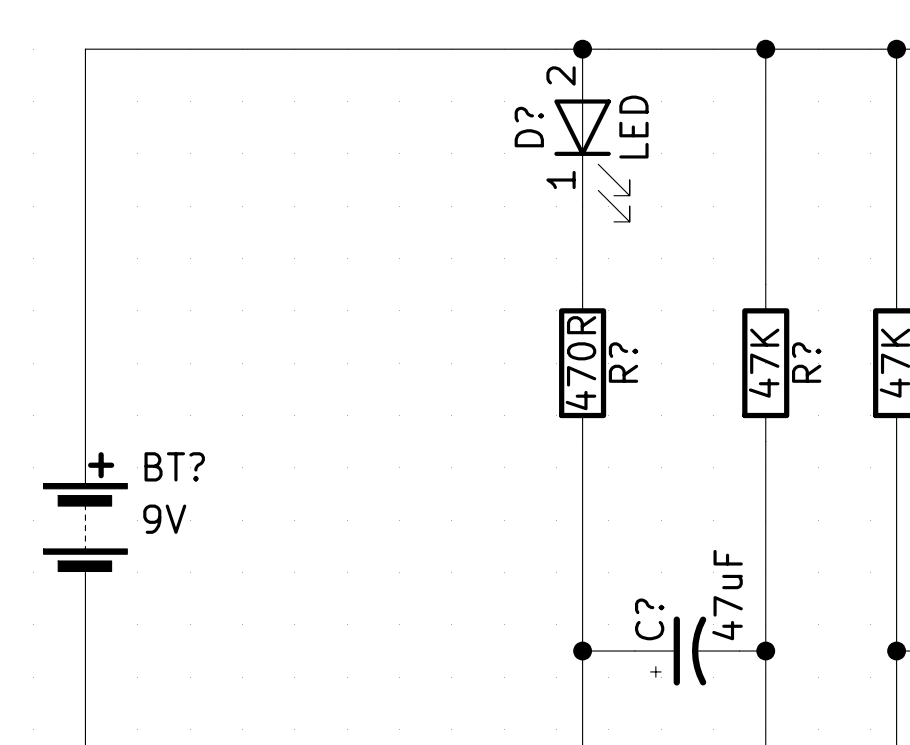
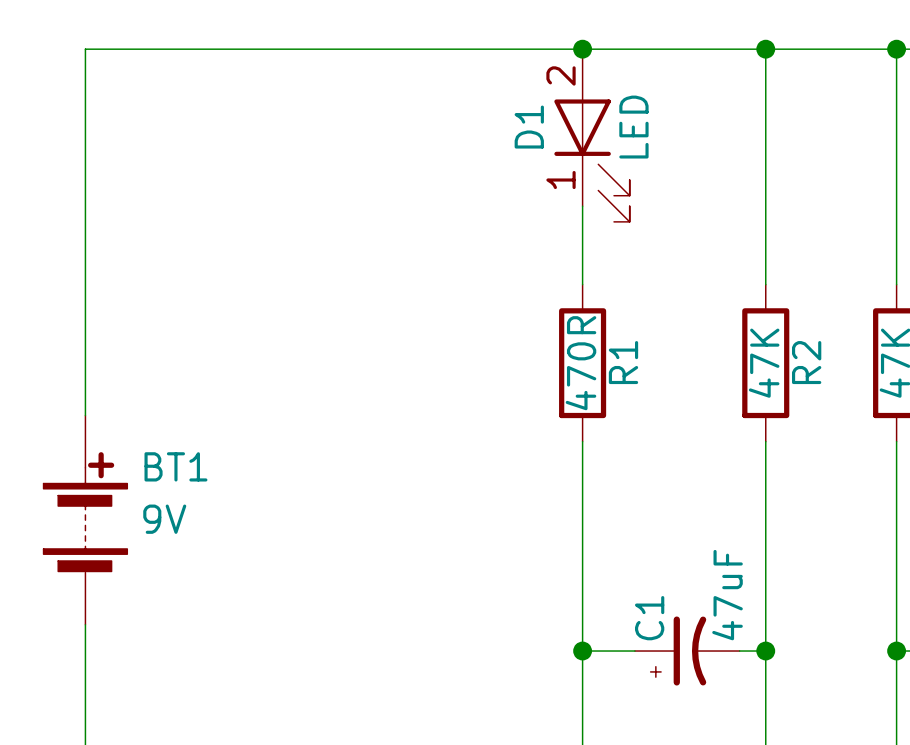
D? name: D? (529, 127) -> D1 (529, 127)
R? name: R? (623, 362) -> R1 (623, 362)
R? name: R? (806, 362) -> R2 (806, 362)
BT? name: BT? (174, 466) -> BT1 (175, 466)
C? name: C? (649, 619) -> C1 (649, 618)

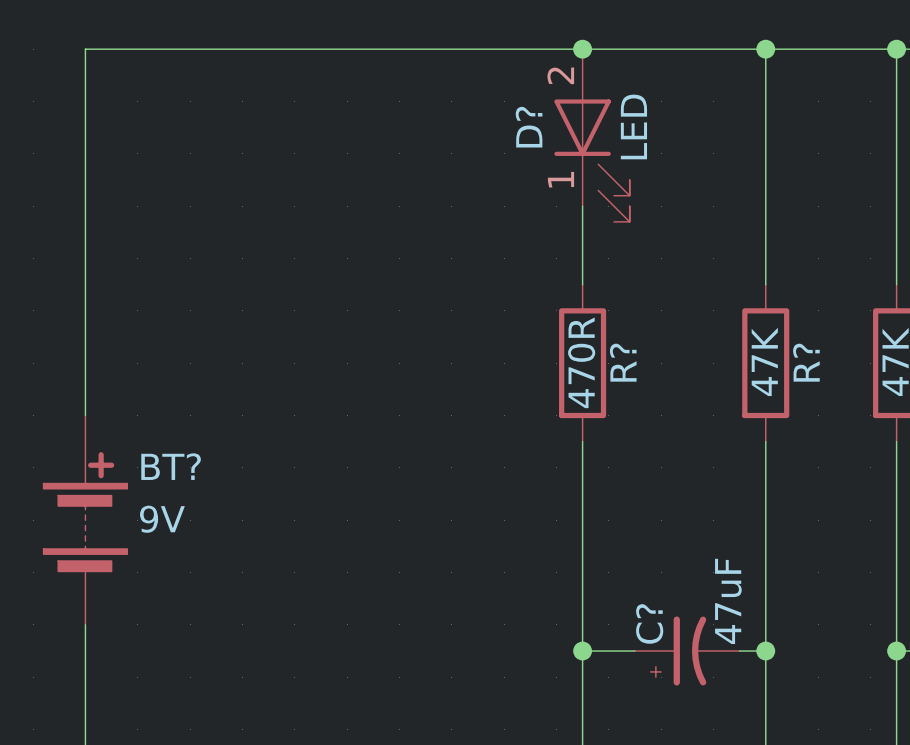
D1 name: D1 (529, 127) -> D? (529, 127)
R1 name: R1 (623, 362) -> R? (623, 362)
R2 name: R2 (806, 362) -> R? (806, 362)
BT1 name: BT1 (175, 466) -> BT? (171, 466)
C1 name: C1 (649, 618) -> C? (649, 623)

